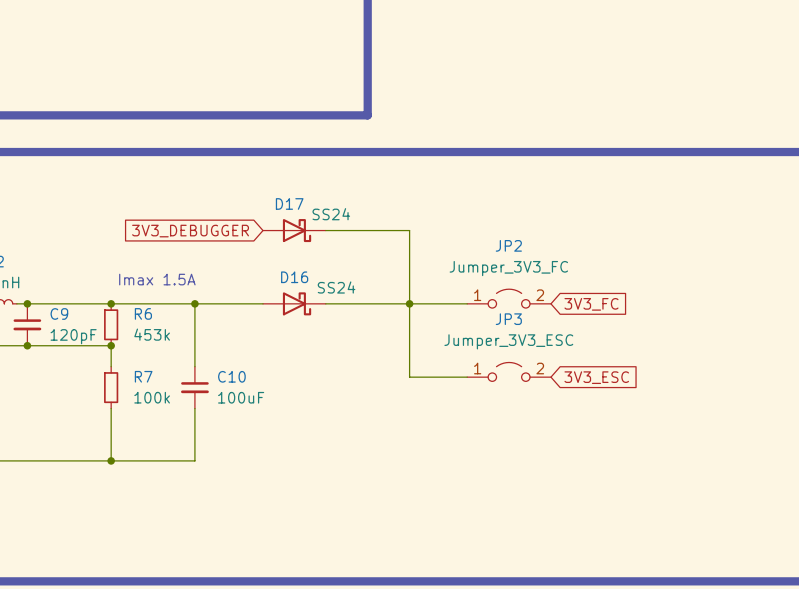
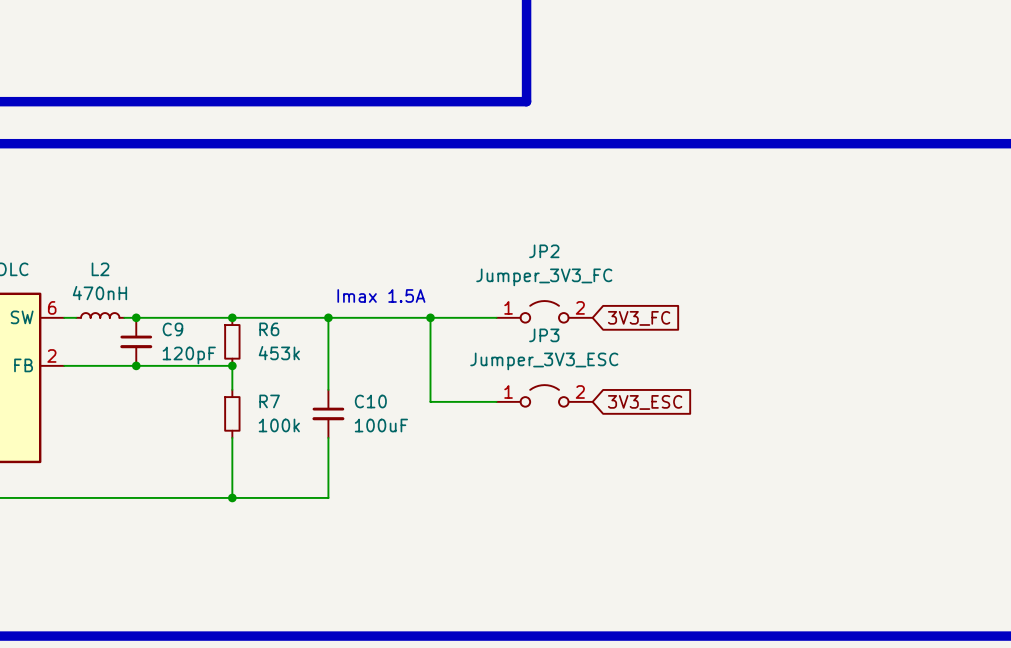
D17: SS24 (294, 230) -> none
wire: (325, 230) (409, 230) (409, 377) (467, 377) -> none
global label: 3V3_DEBUGGER (190, 231) -> none
text position: Imax 1.5A (157, 279) -> Imax 1.5A (381, 295)
JP2 position: (509, 298) -> (544, 311)
wire: none -> (430, 317) (430, 401) (496, 401)
junction: none -> (430, 317)
D16: SS24 (294, 303) -> none
wire: (341, 303) (467, 303) -> none
junction: (409, 303) -> none
global label position: 3V3_FC (591, 304) -> 3V3_FC (639, 318)
JP3 position: (509, 371) -> (544, 395)
global label position: 3V3_ESC (596, 377) -> 3V3_ESC (645, 402)

